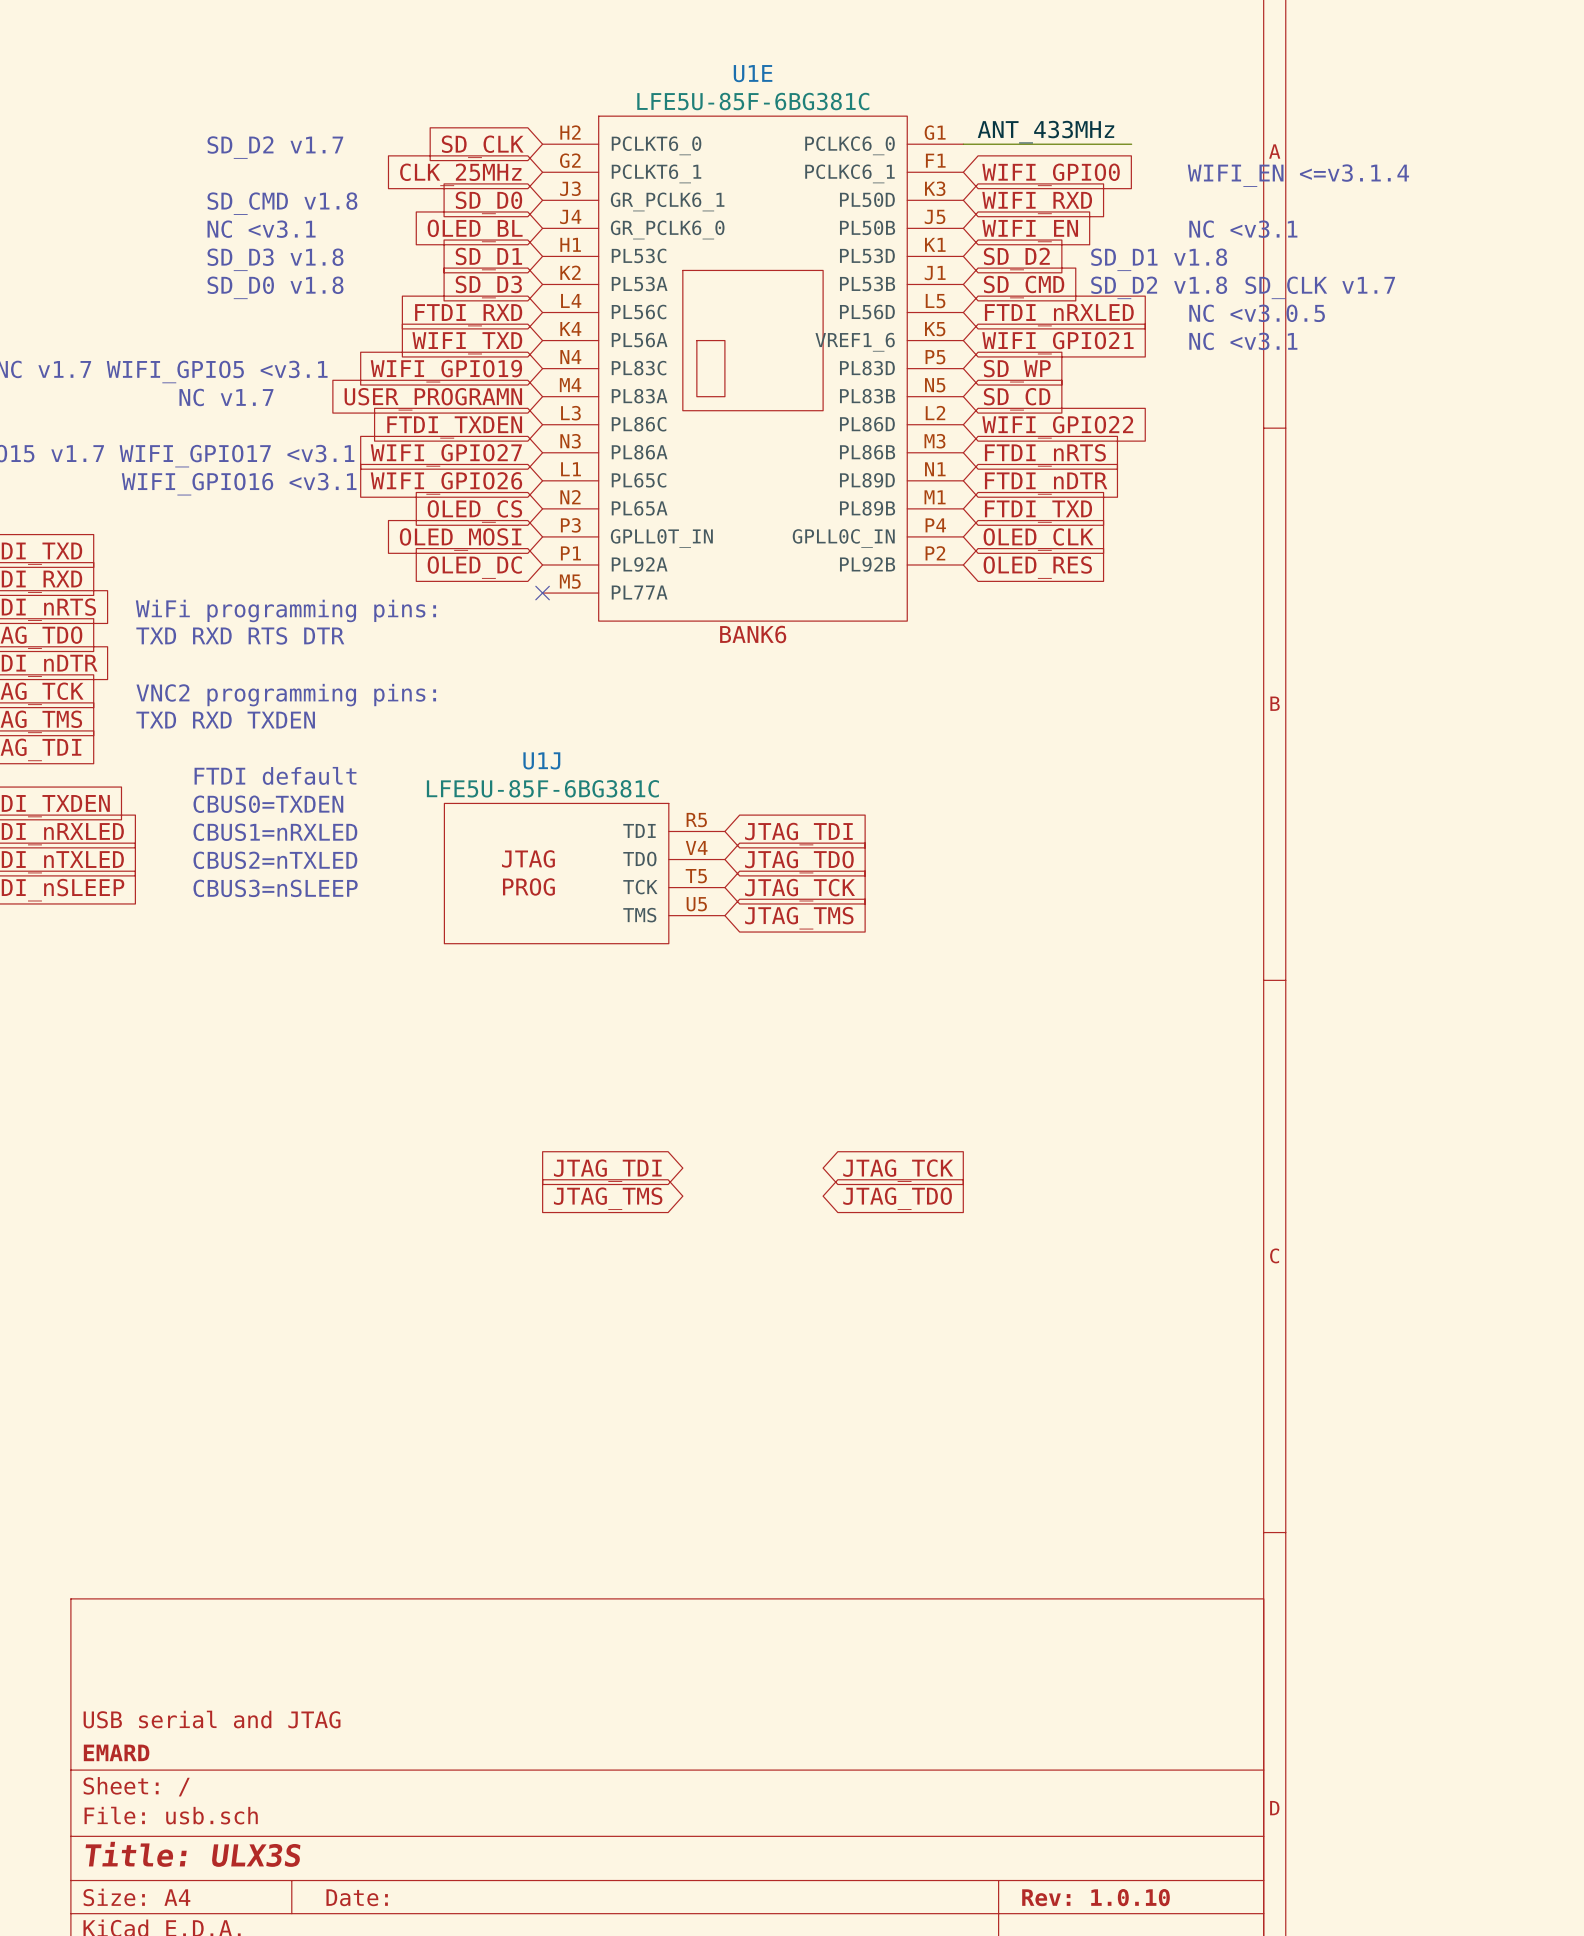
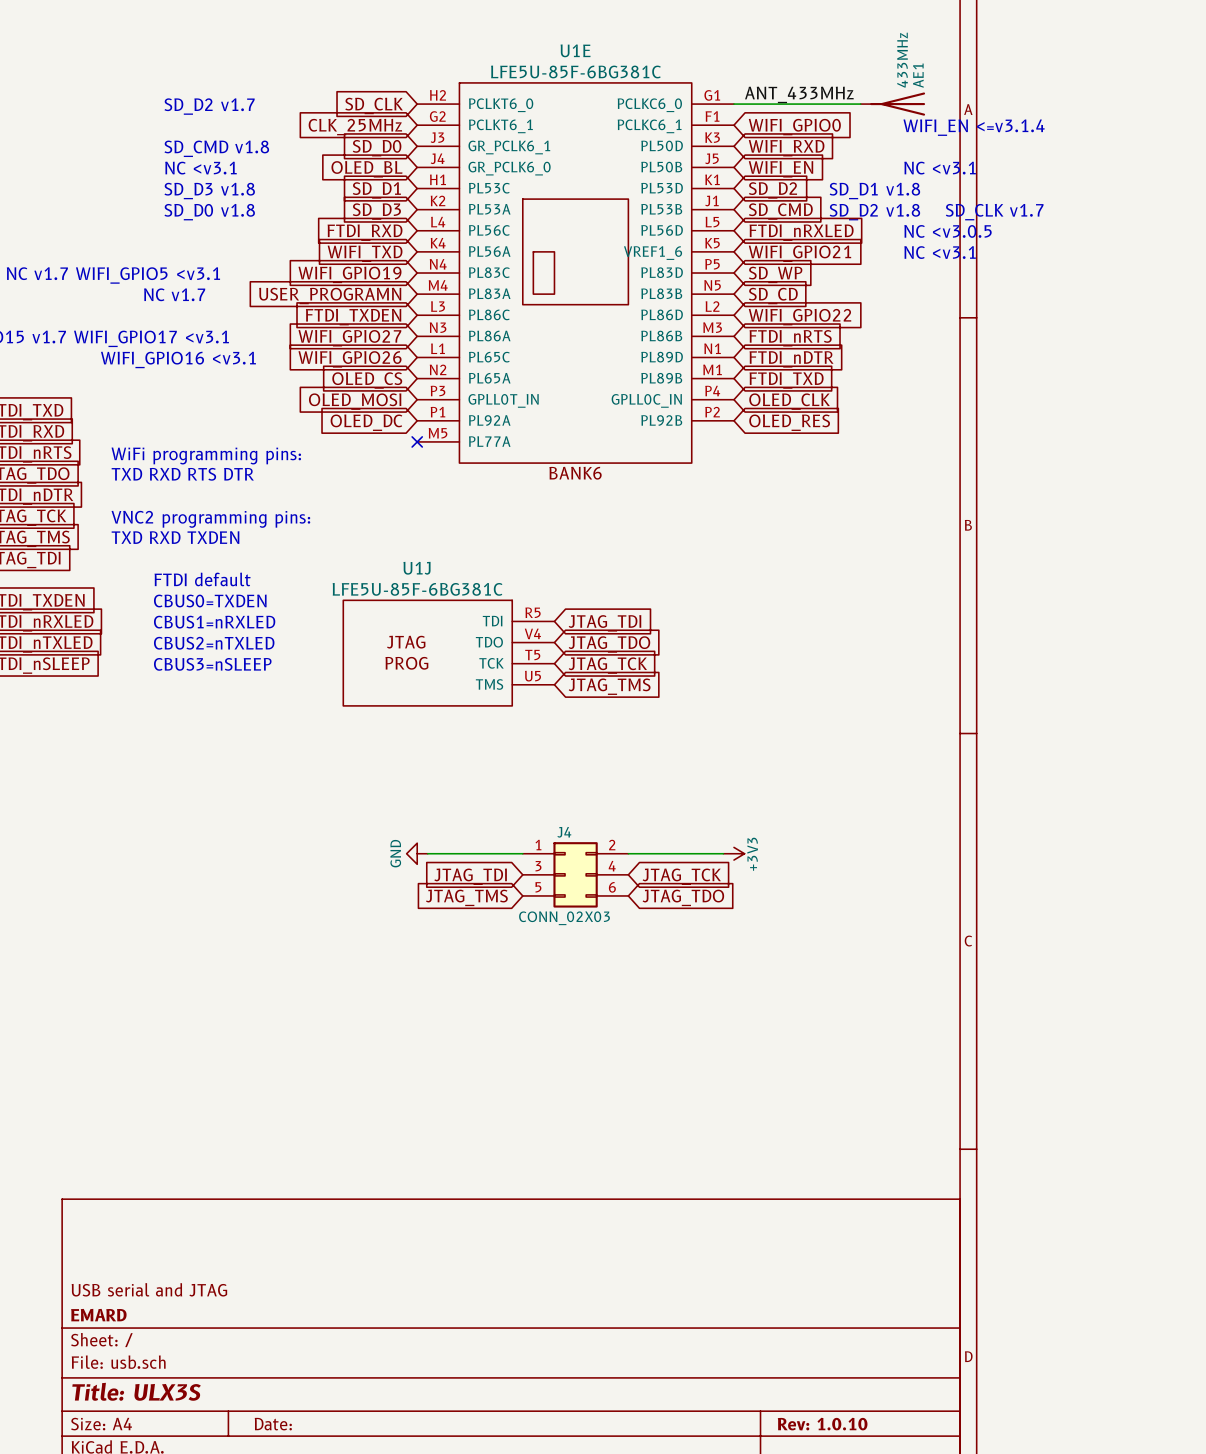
AE1: none -> 433MHz (892, 104)
power symbol: none -> GND (417, 853)
wire: none -> (427, 853) (522, 853)
wire: none -> (628, 853) (723, 853)
power symbol: none -> +3V3 (733, 853)
J4: none -> CONN_02X03 (575, 874)

